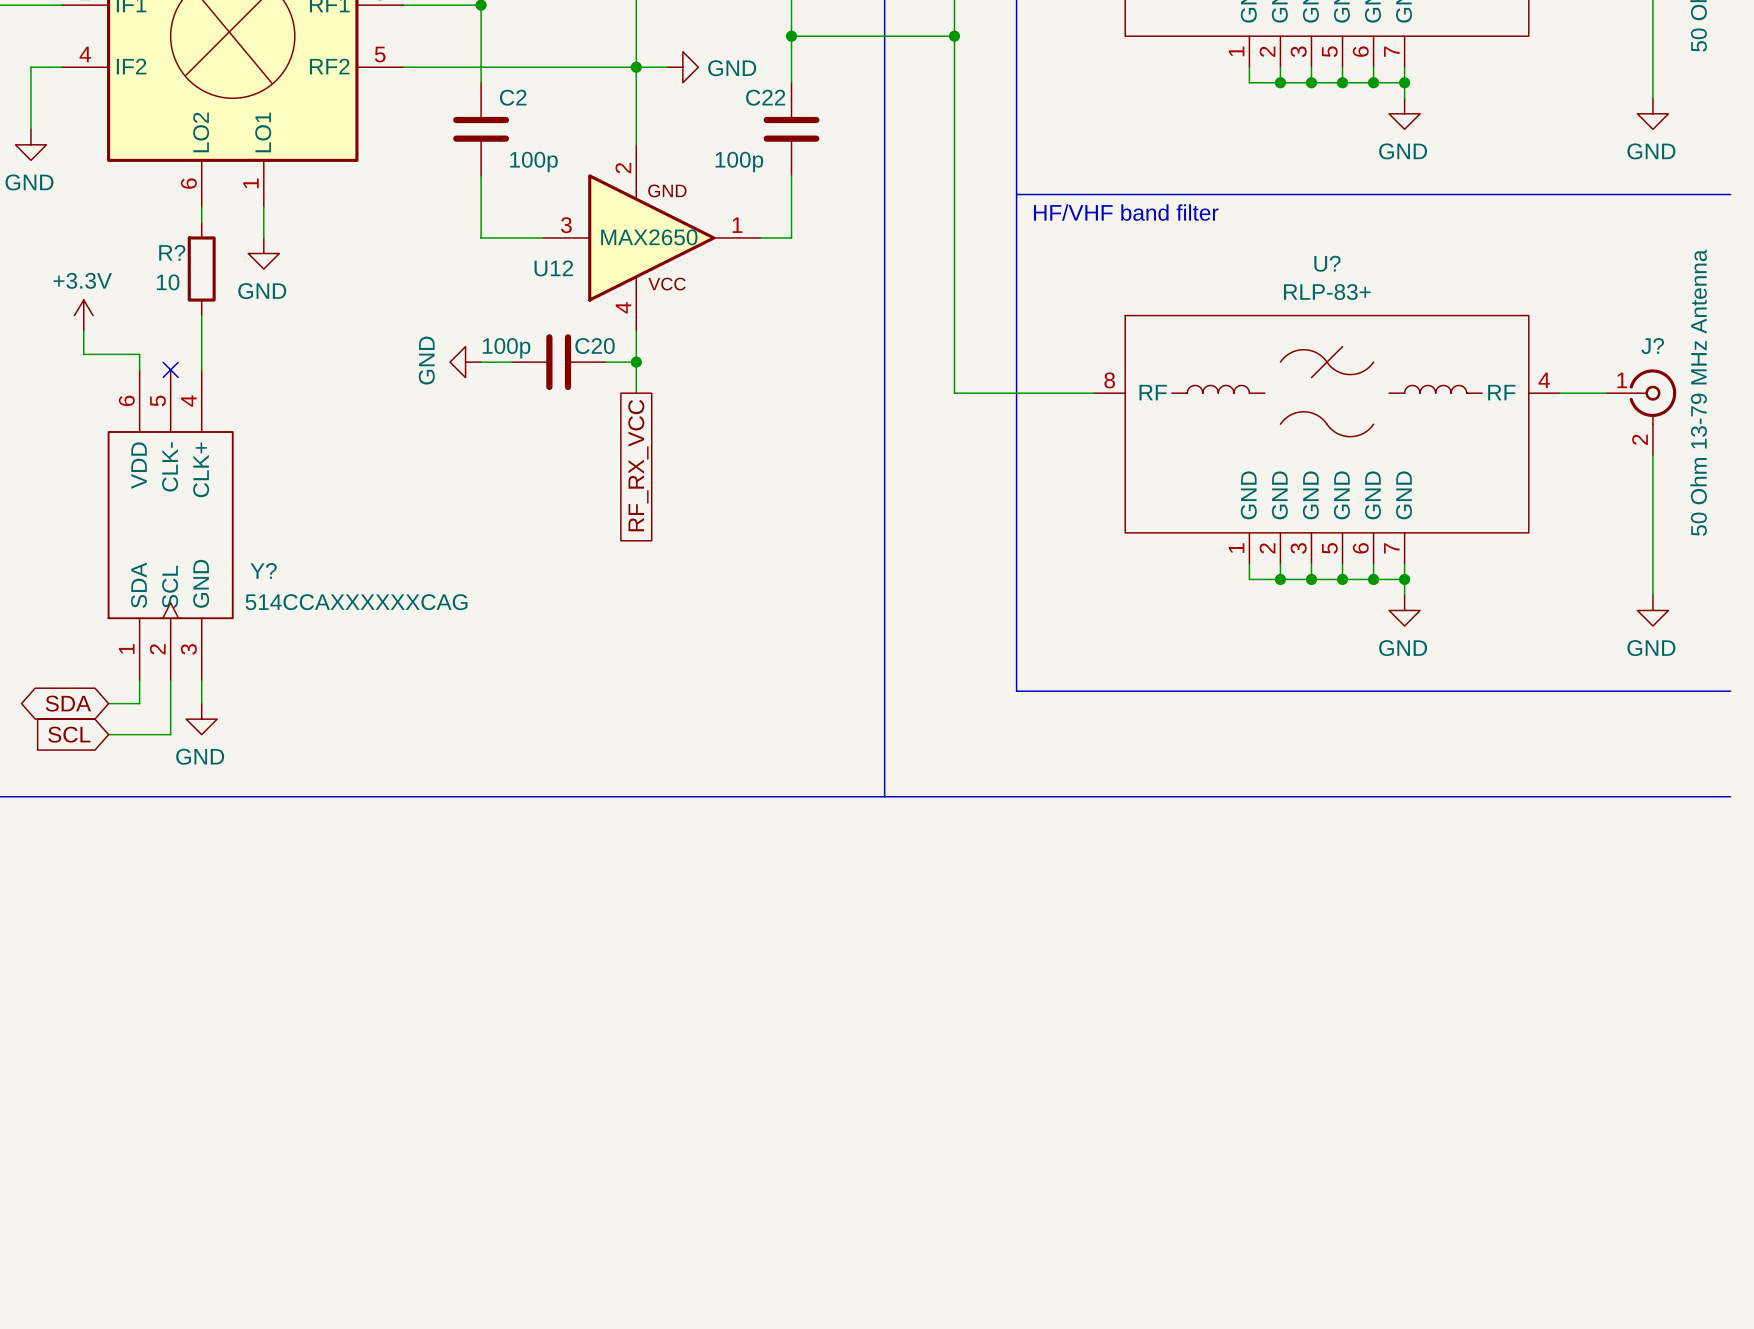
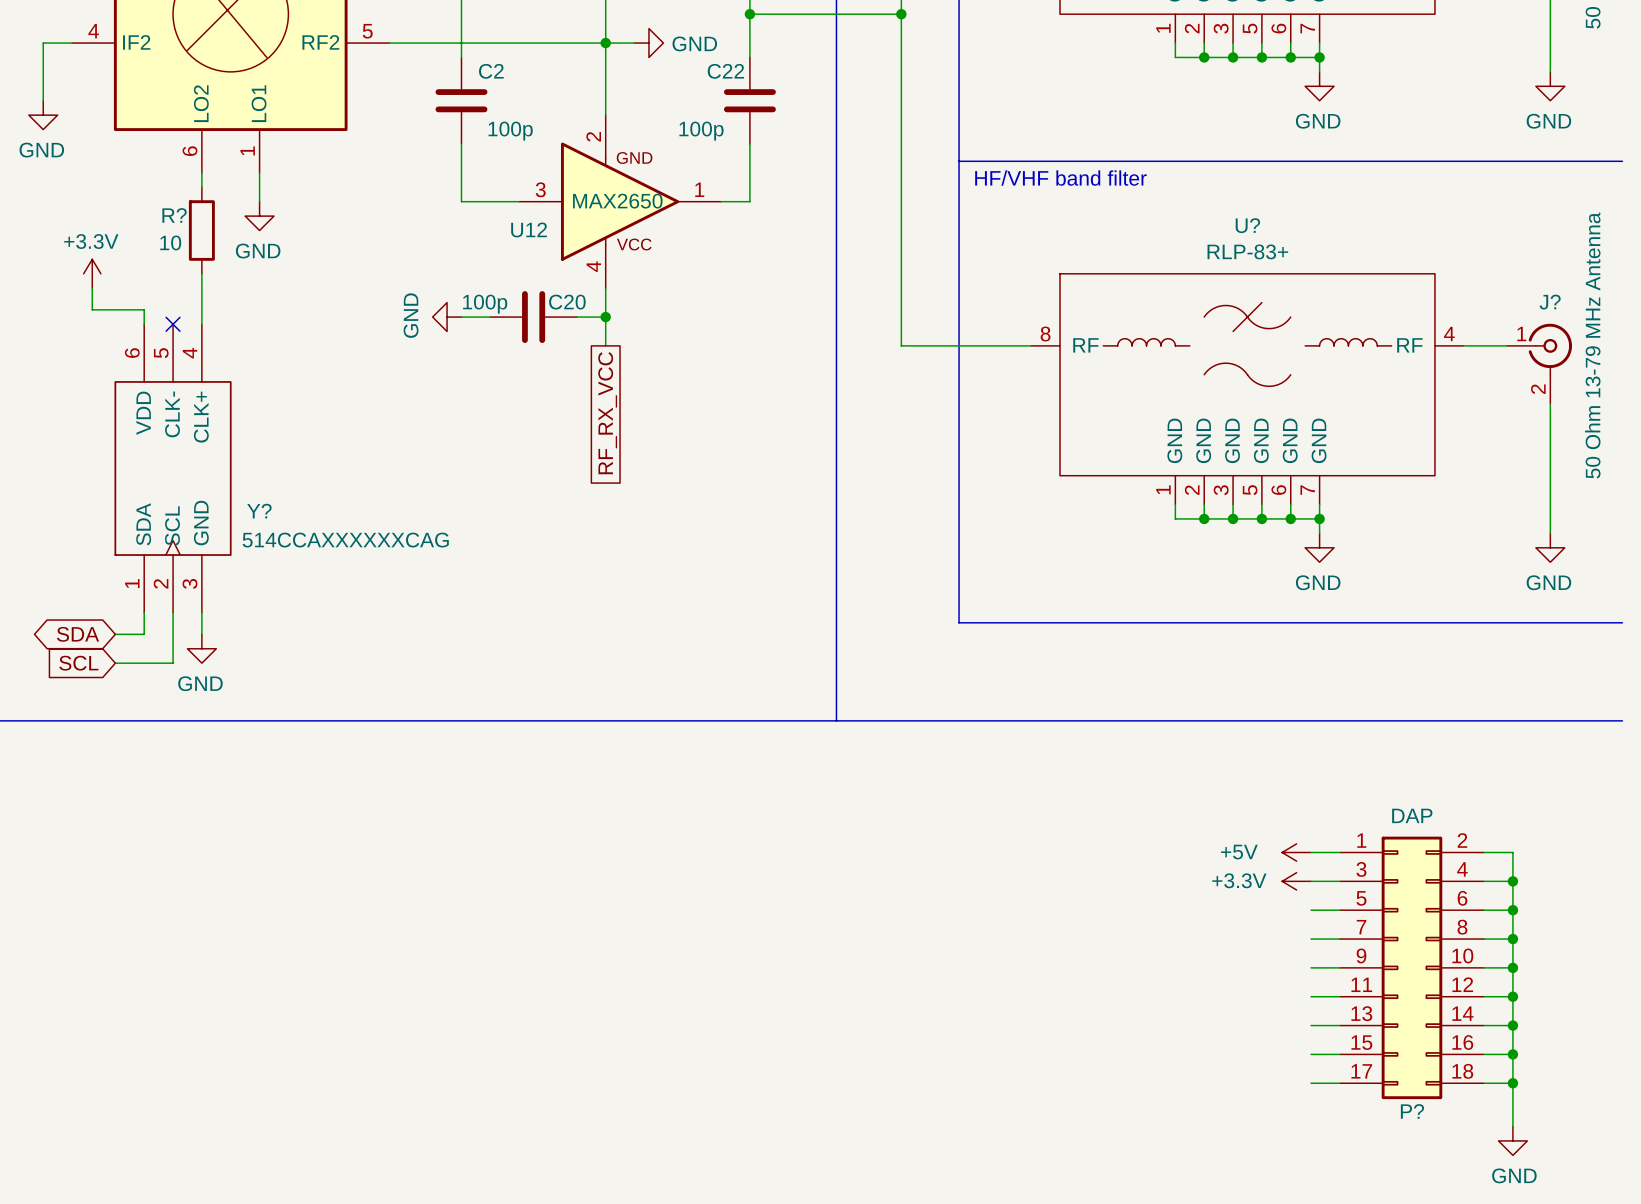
power symbol: none -> +5V (1296, 852)
wire: none -> (1311, 852) (1339, 852)
wire: none -> (1484, 852) (1512, 852) (1512, 1126)
power symbol: none -> +3.3V (1296, 881)
wire: none -> (1311, 881) (1339, 881)
wire: none -> (1484, 881) (1512, 881)
junction: none -> (1512, 881)
wire: none -> (1311, 910) (1339, 910)
wire: none -> (1484, 910) (1512, 910)
junction: none -> (1512, 910)
wire: none -> (1311, 939) (1339, 939)
wire: none -> (1484, 939) (1512, 939)
junction: none -> (1512, 939)
wire: none -> (1311, 967) (1339, 967)
P?: none -> DAP (1411, 967)
wire: none -> (1484, 967) (1512, 967)
junction: none -> (1512, 967)
wire: none -> (1311, 996) (1339, 996)
wire: none -> (1484, 996) (1512, 996)
junction: none -> (1512, 996)
wire: none -> (1311, 1025) (1339, 1025)
wire: none -> (1484, 1025) (1512, 1025)
junction: none -> (1512, 1025)
wire: none -> (1311, 1054) (1339, 1054)
wire: none -> (1484, 1054) (1512, 1054)
junction: none -> (1512, 1054)
wire: none -> (1311, 1083) (1339, 1083)
wire: none -> (1484, 1083) (1512, 1083)
junction: none -> (1512, 1083)
power symbol: none -> GND (1512, 1140)

